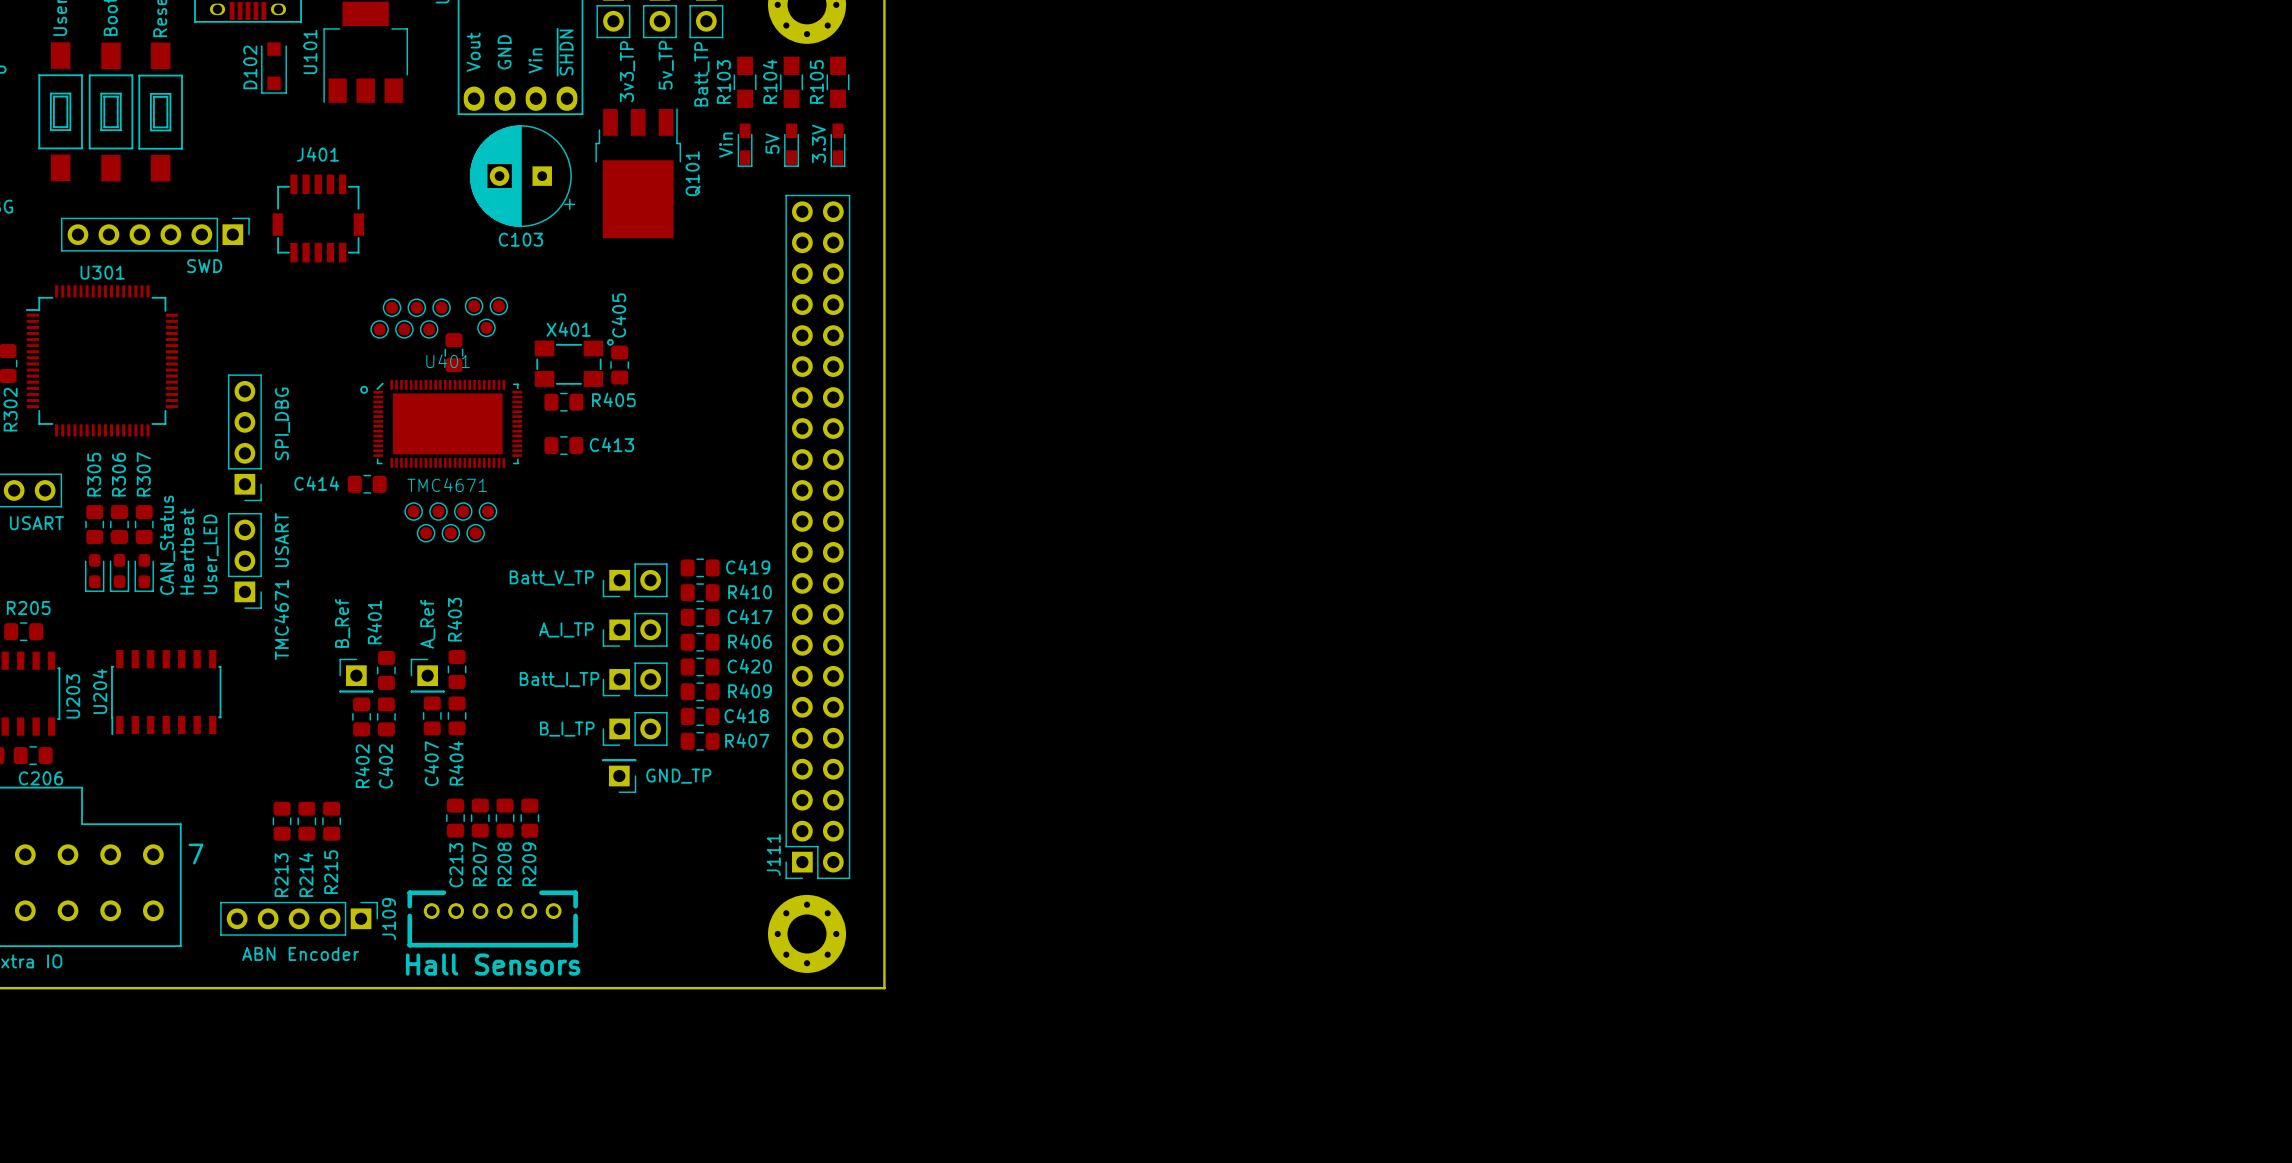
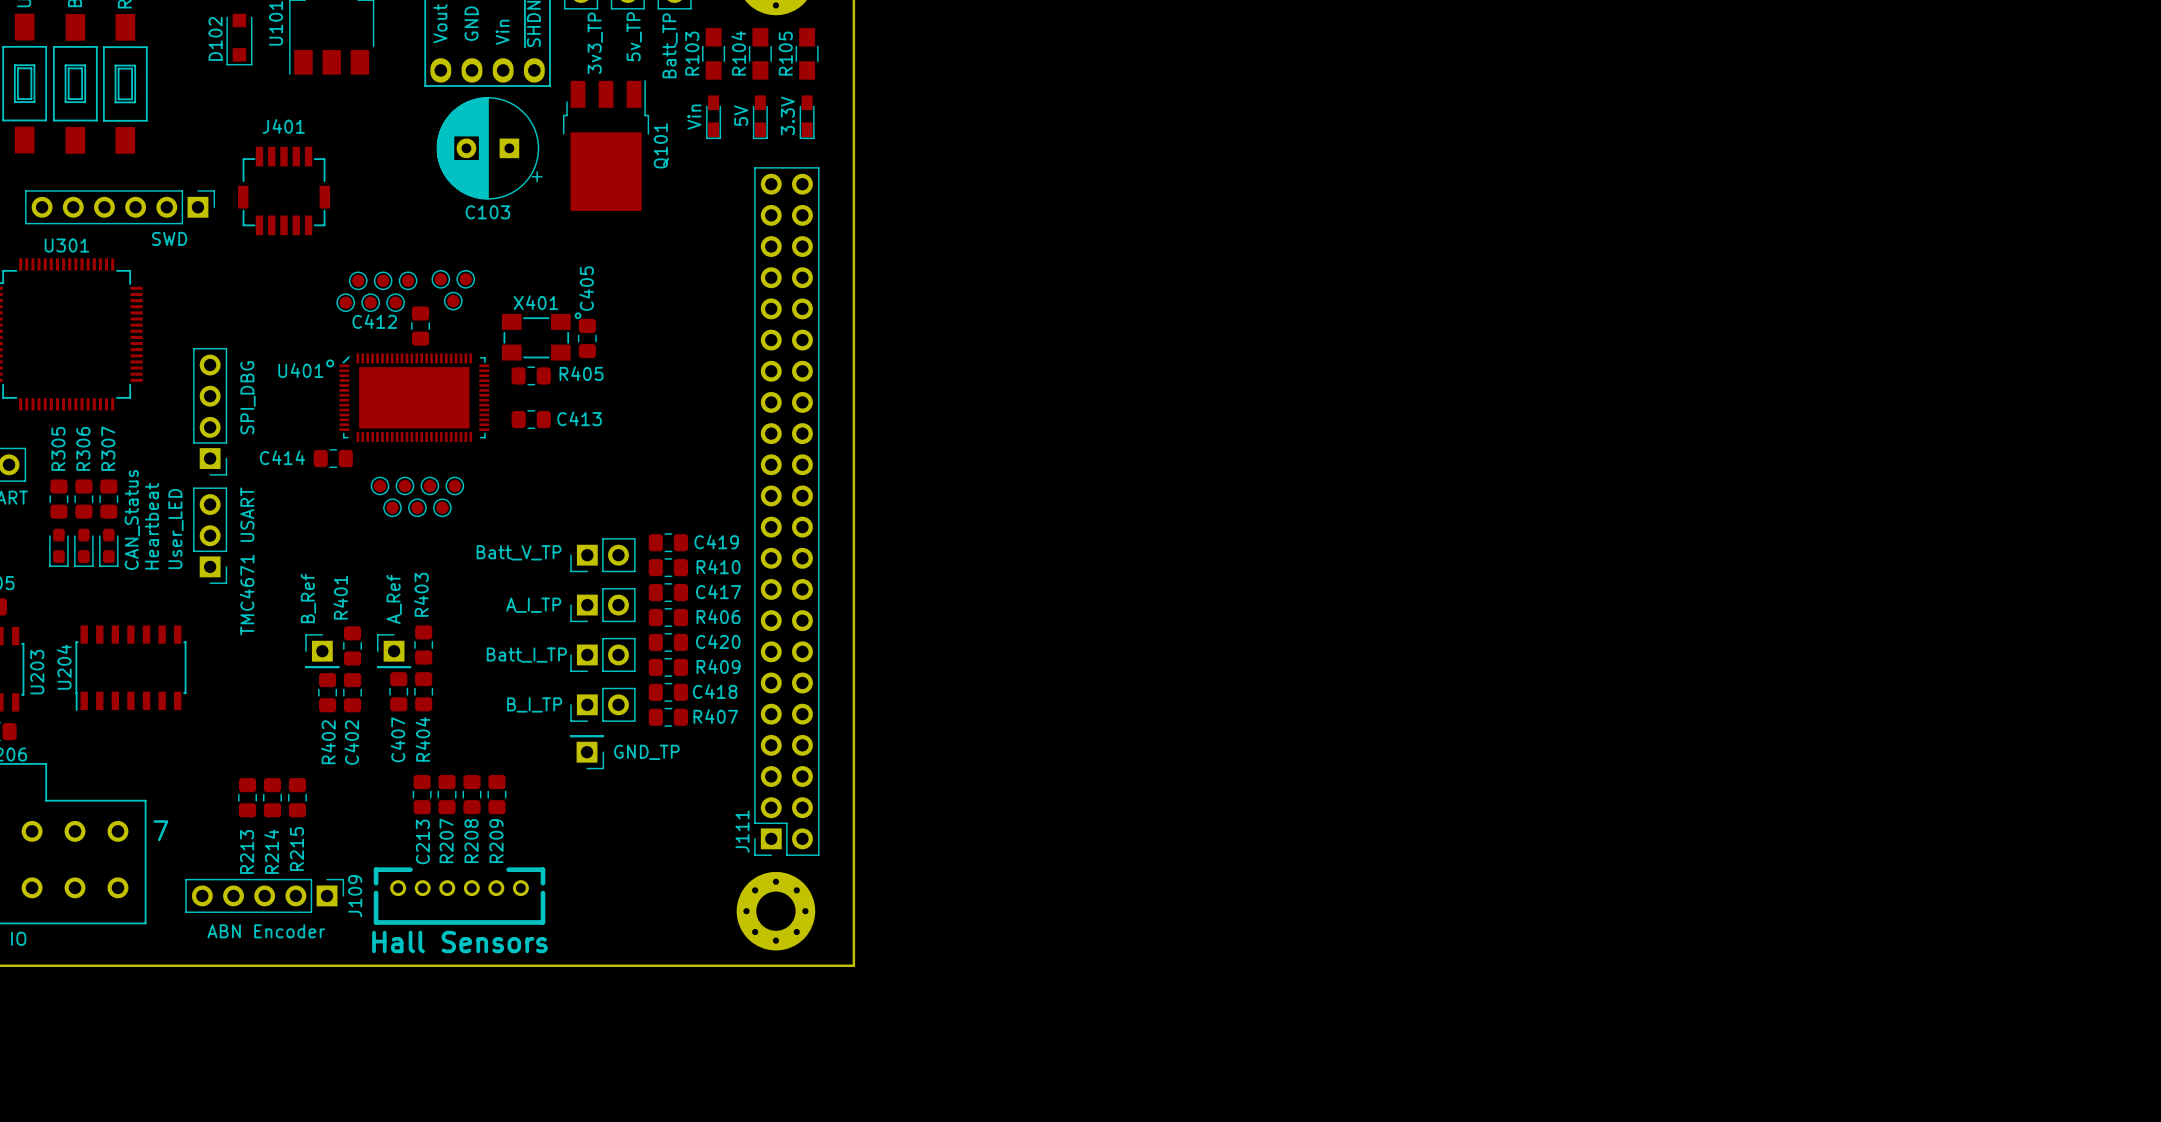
C412 name: none -> C412 (374, 321)
U401 name position: U401 (448, 361) -> U401 (300, 370)
U401 value: TMC4671 (447, 485) -> none

